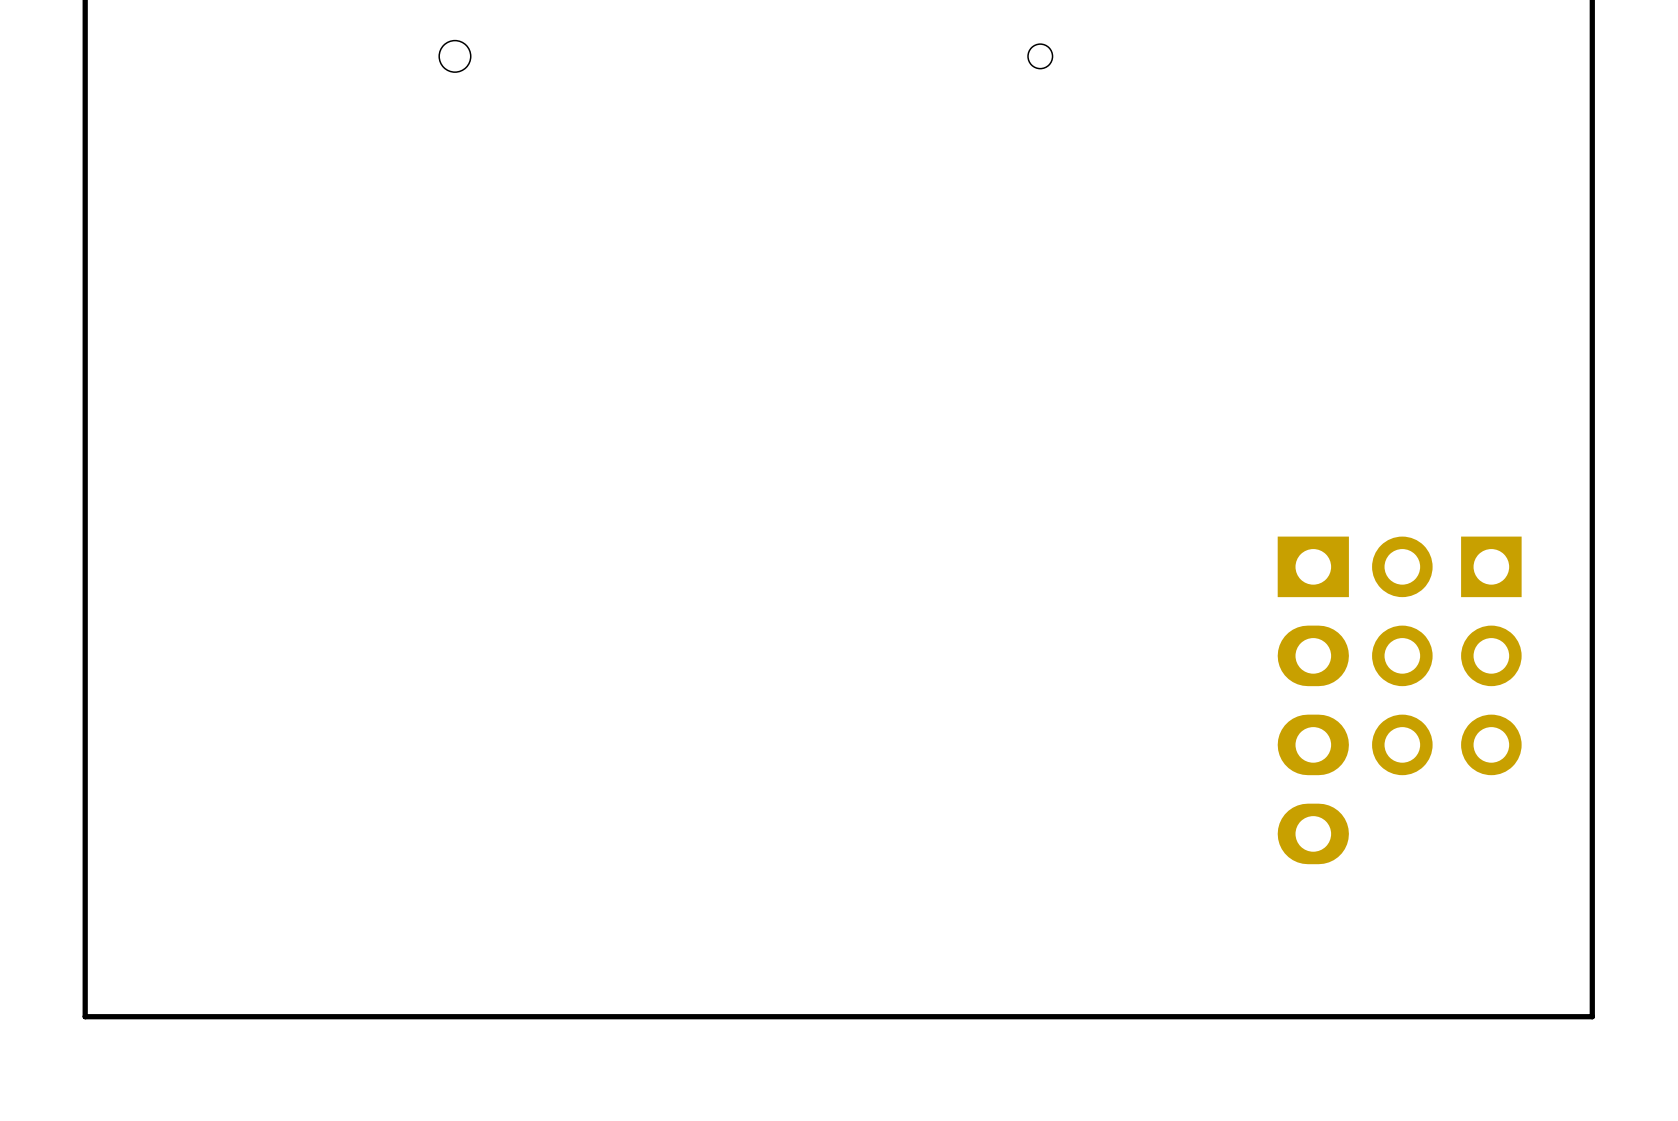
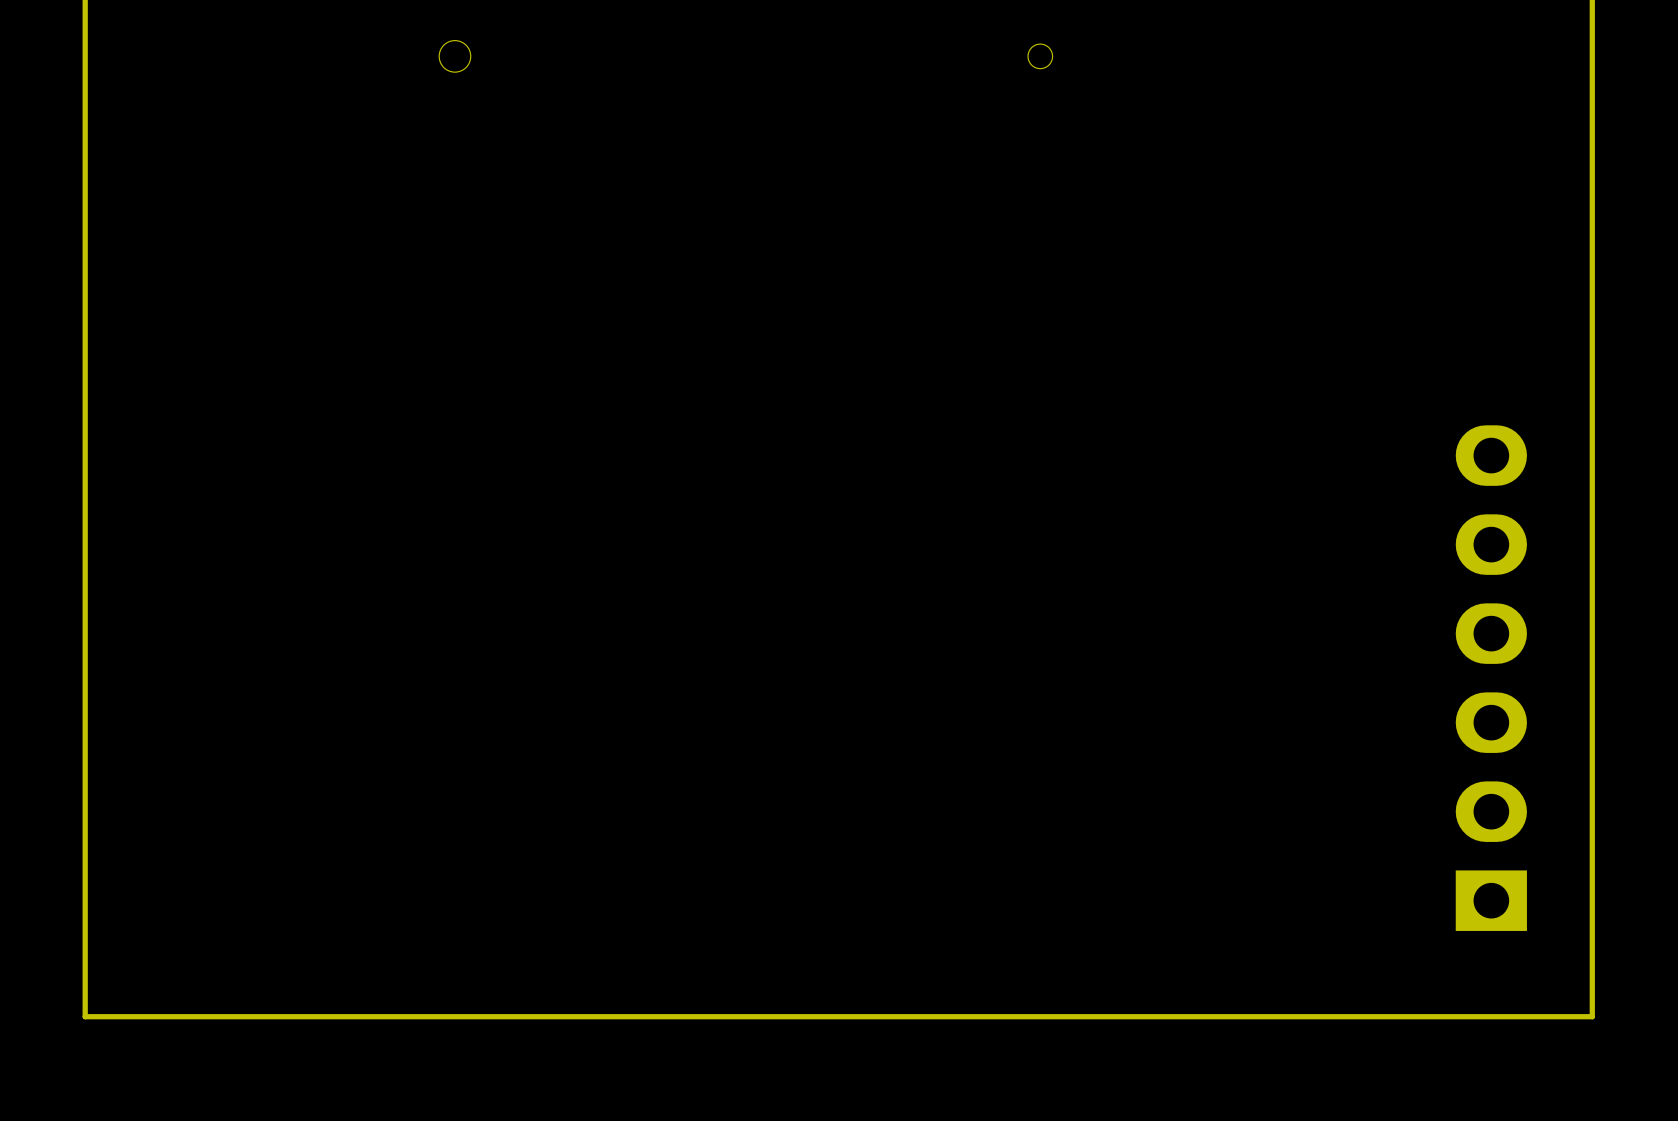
part: (1446, 655) -> none
part: none -> (1491, 678)
part: (1313, 700) -> none

